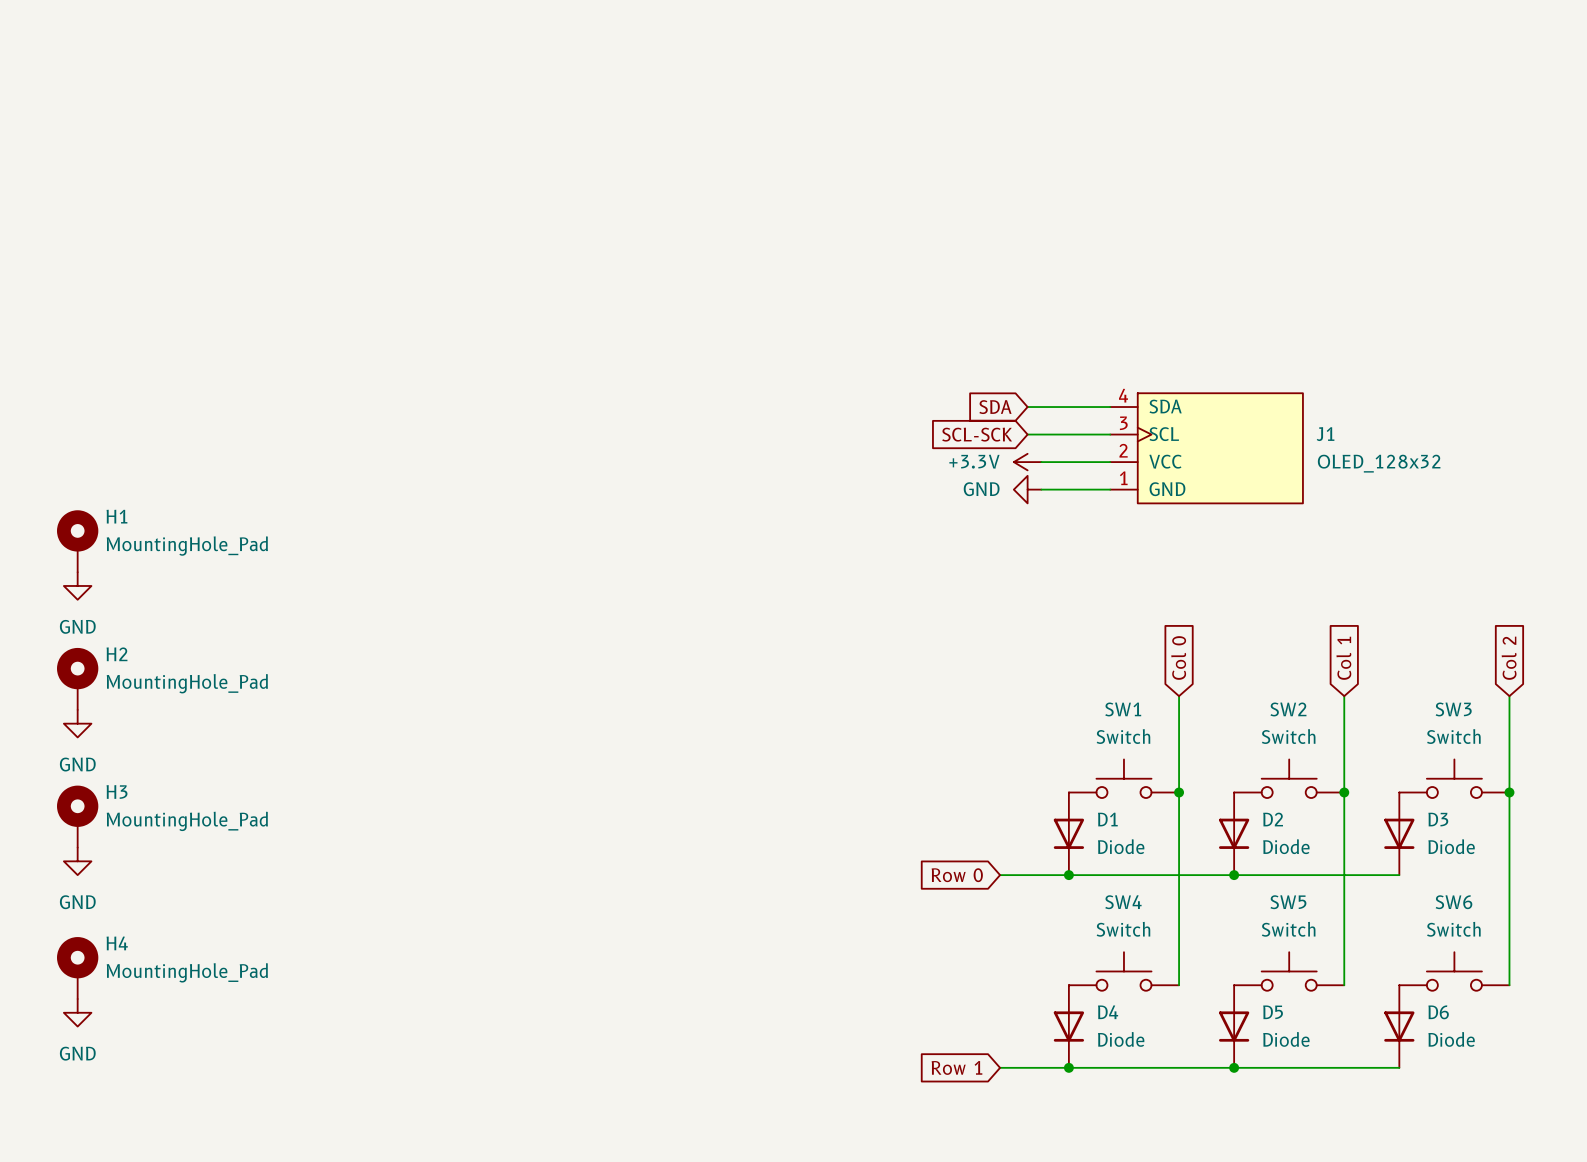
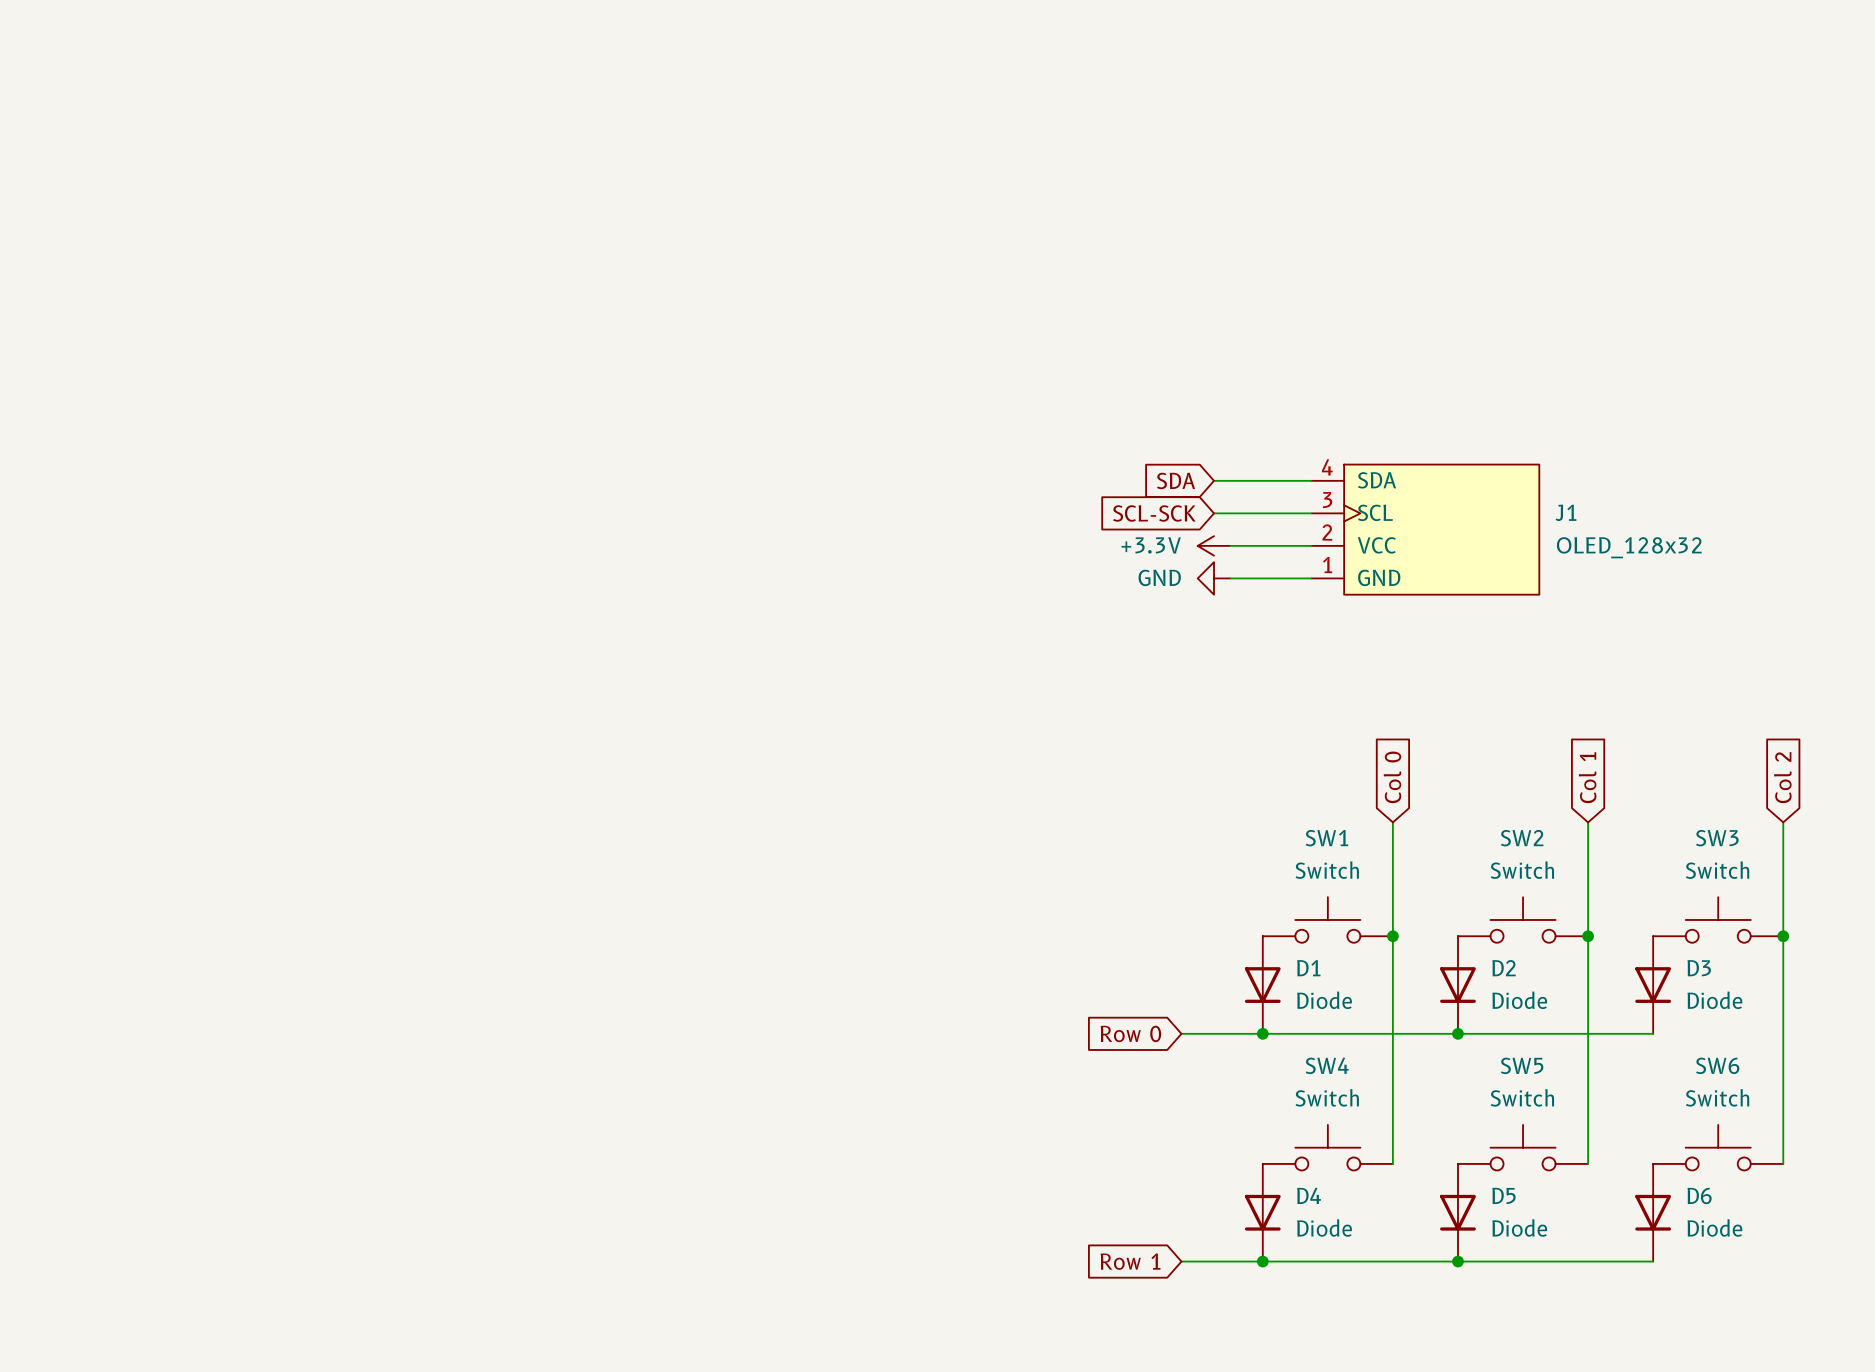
H1: MountingHole_Pad (77, 541) -> none
power symbol: GND (77, 585) -> none
H2: MountingHole_Pad (77, 678) -> none
power symbol: GND (77, 723) -> none
H3: MountingHole_Pad (77, 816) -> none
power symbol: GND (77, 861) -> none
H4: MountingHole_Pad (77, 968) -> none
power symbol: GND (77, 1012) -> none

